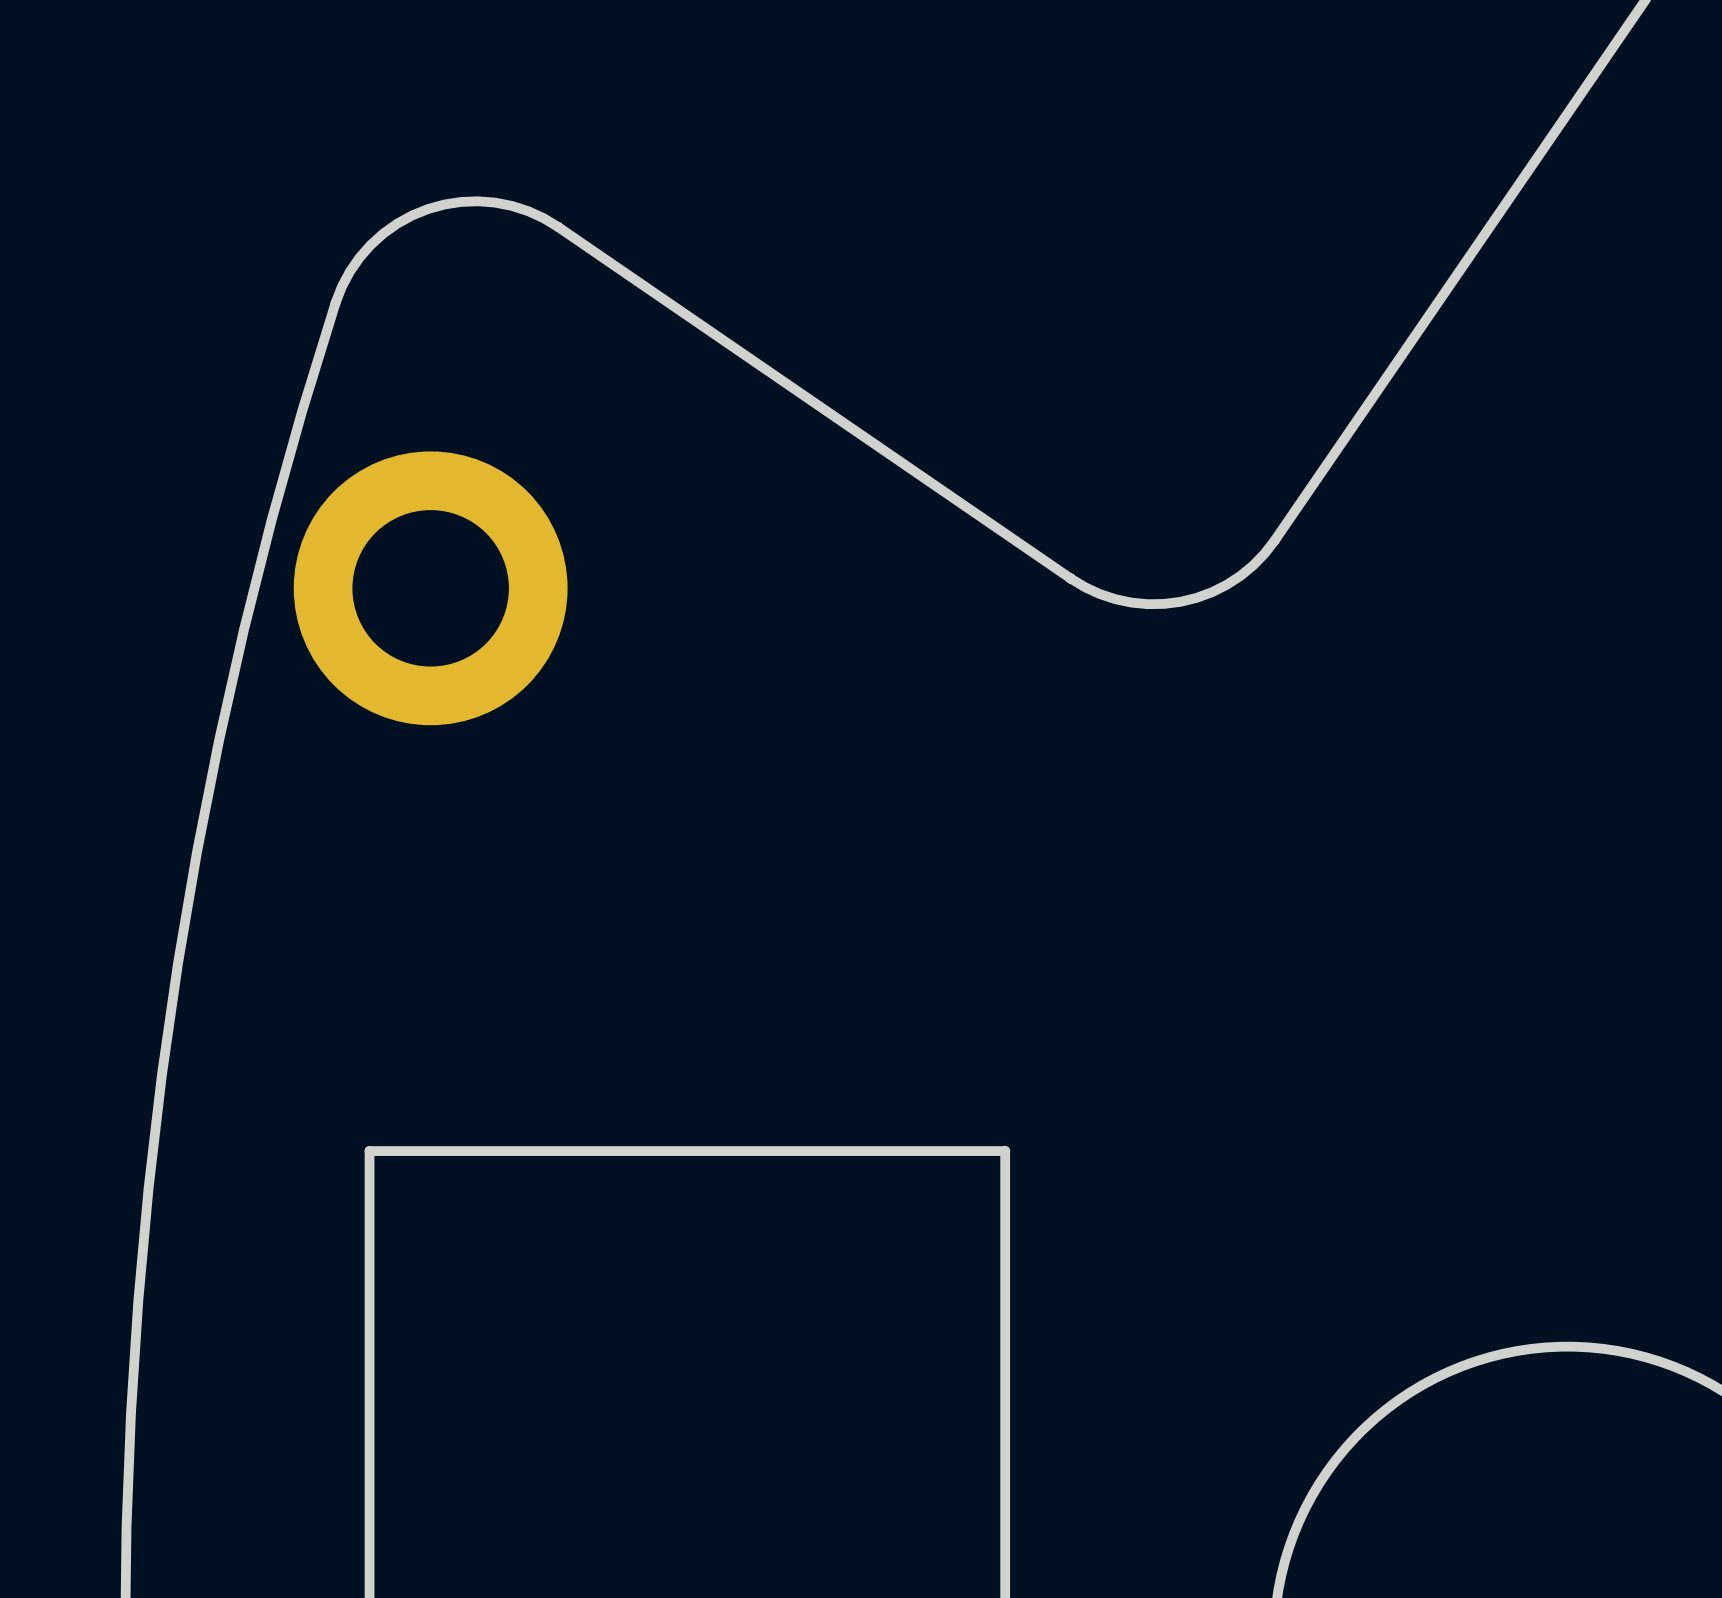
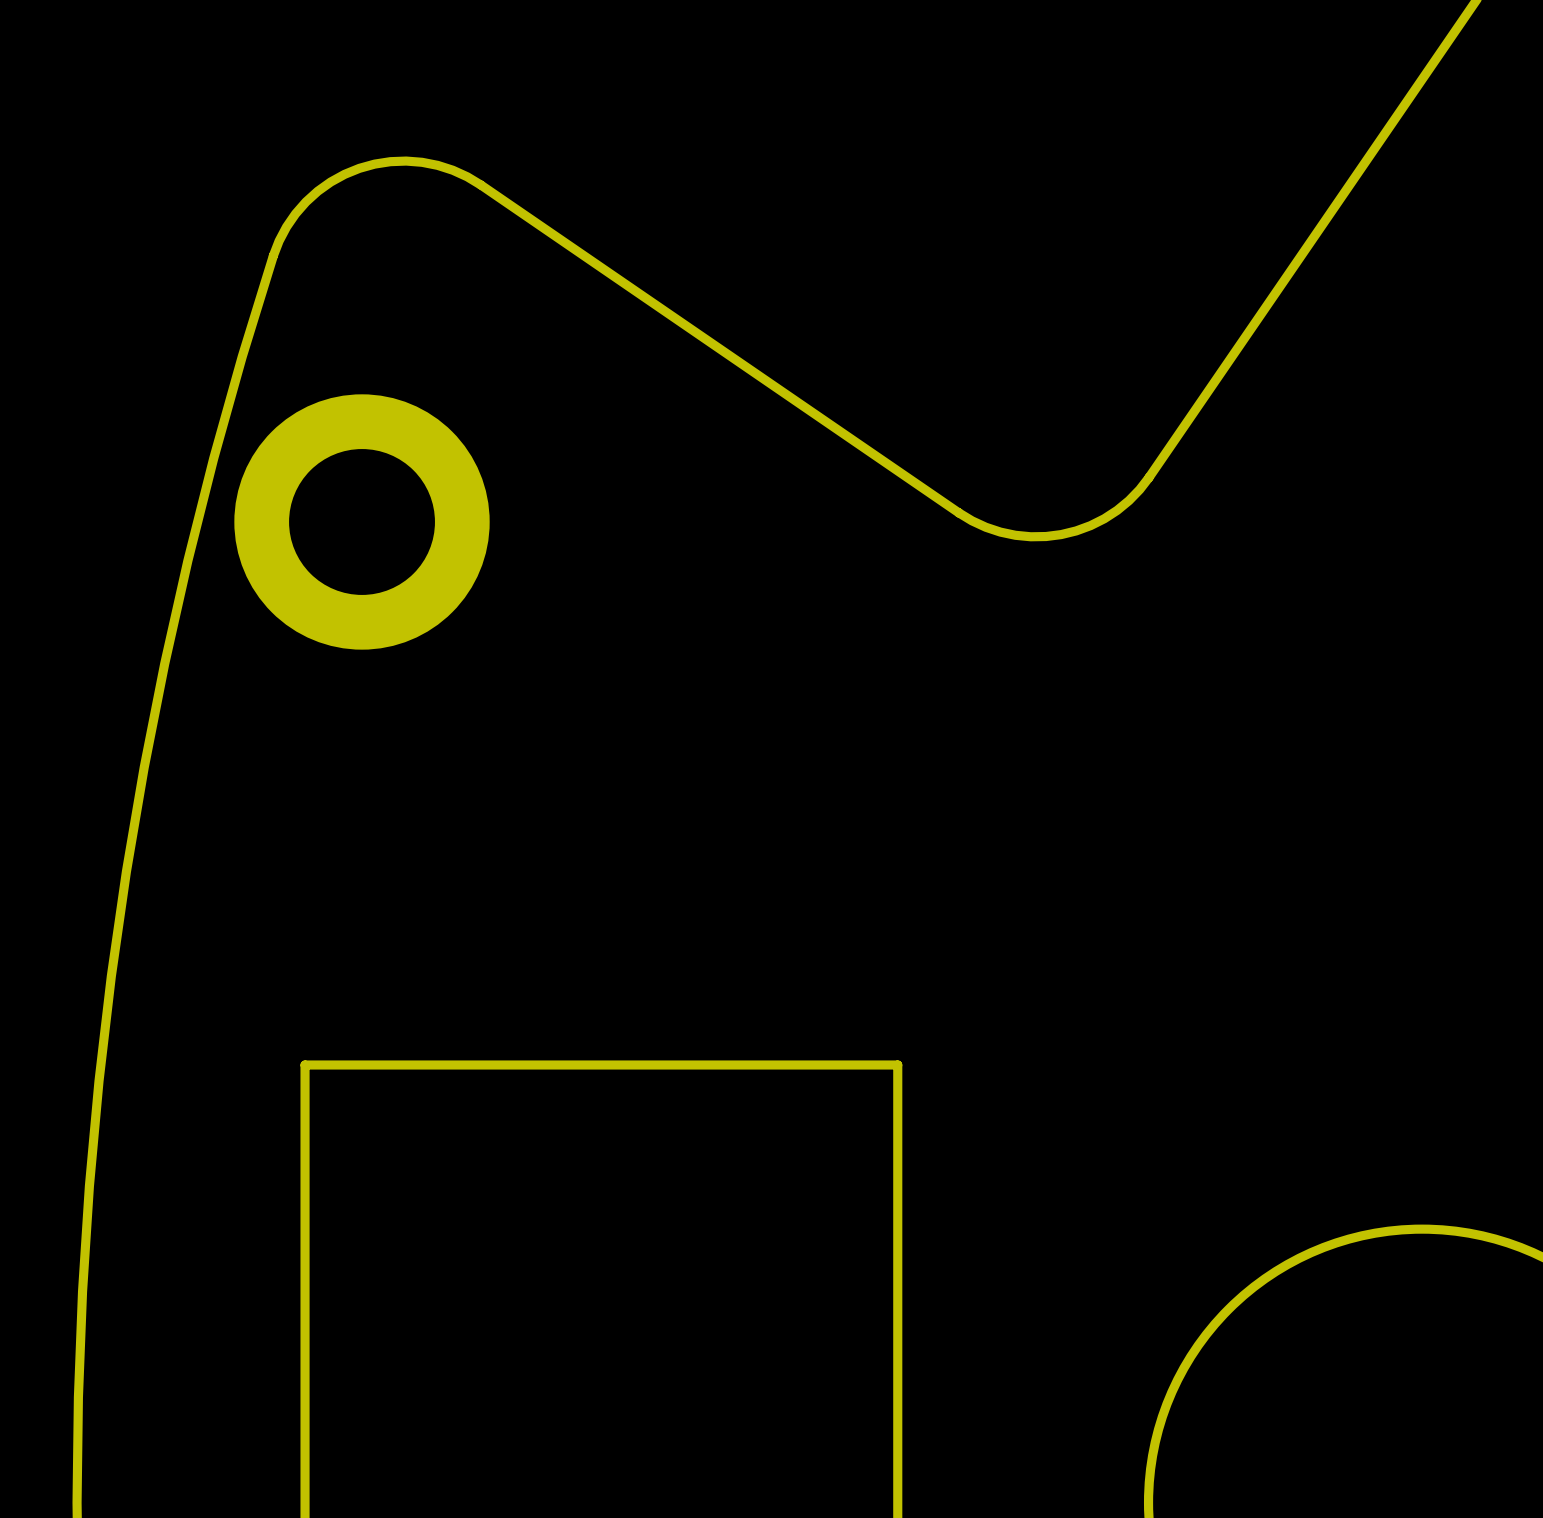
board edge: (369, 1170) (369, 1151) (1005, 1151) (1005, 1170) -> (305, 1065) (897, 1065)

